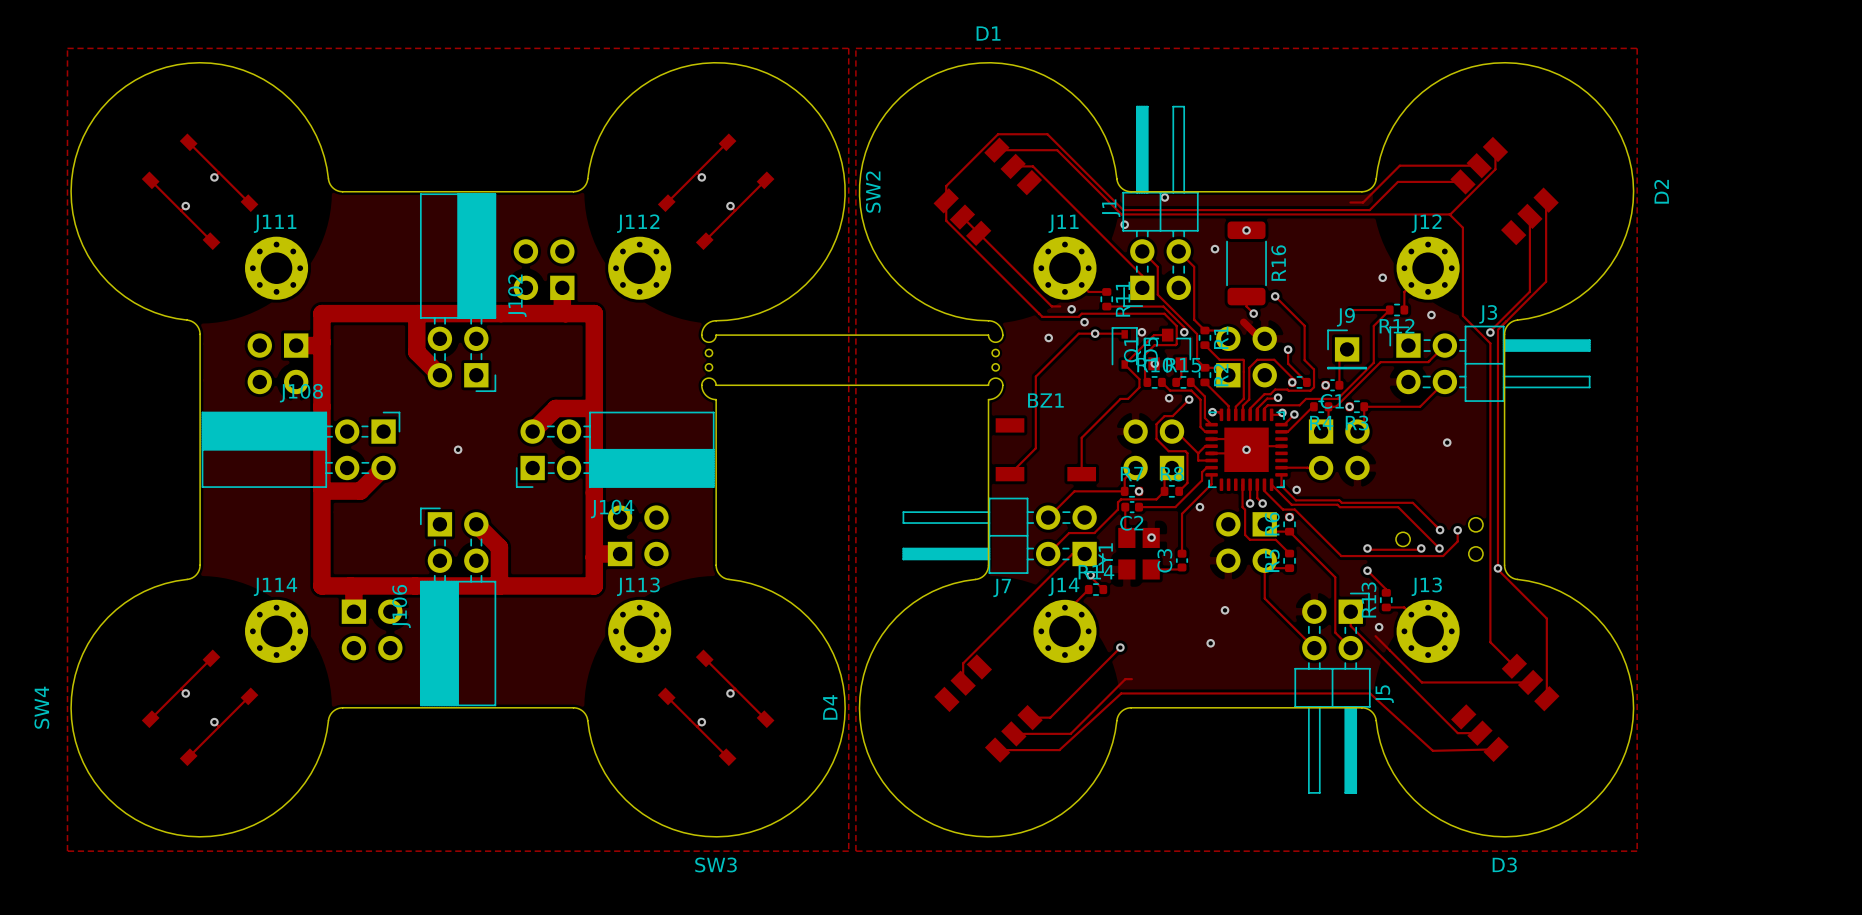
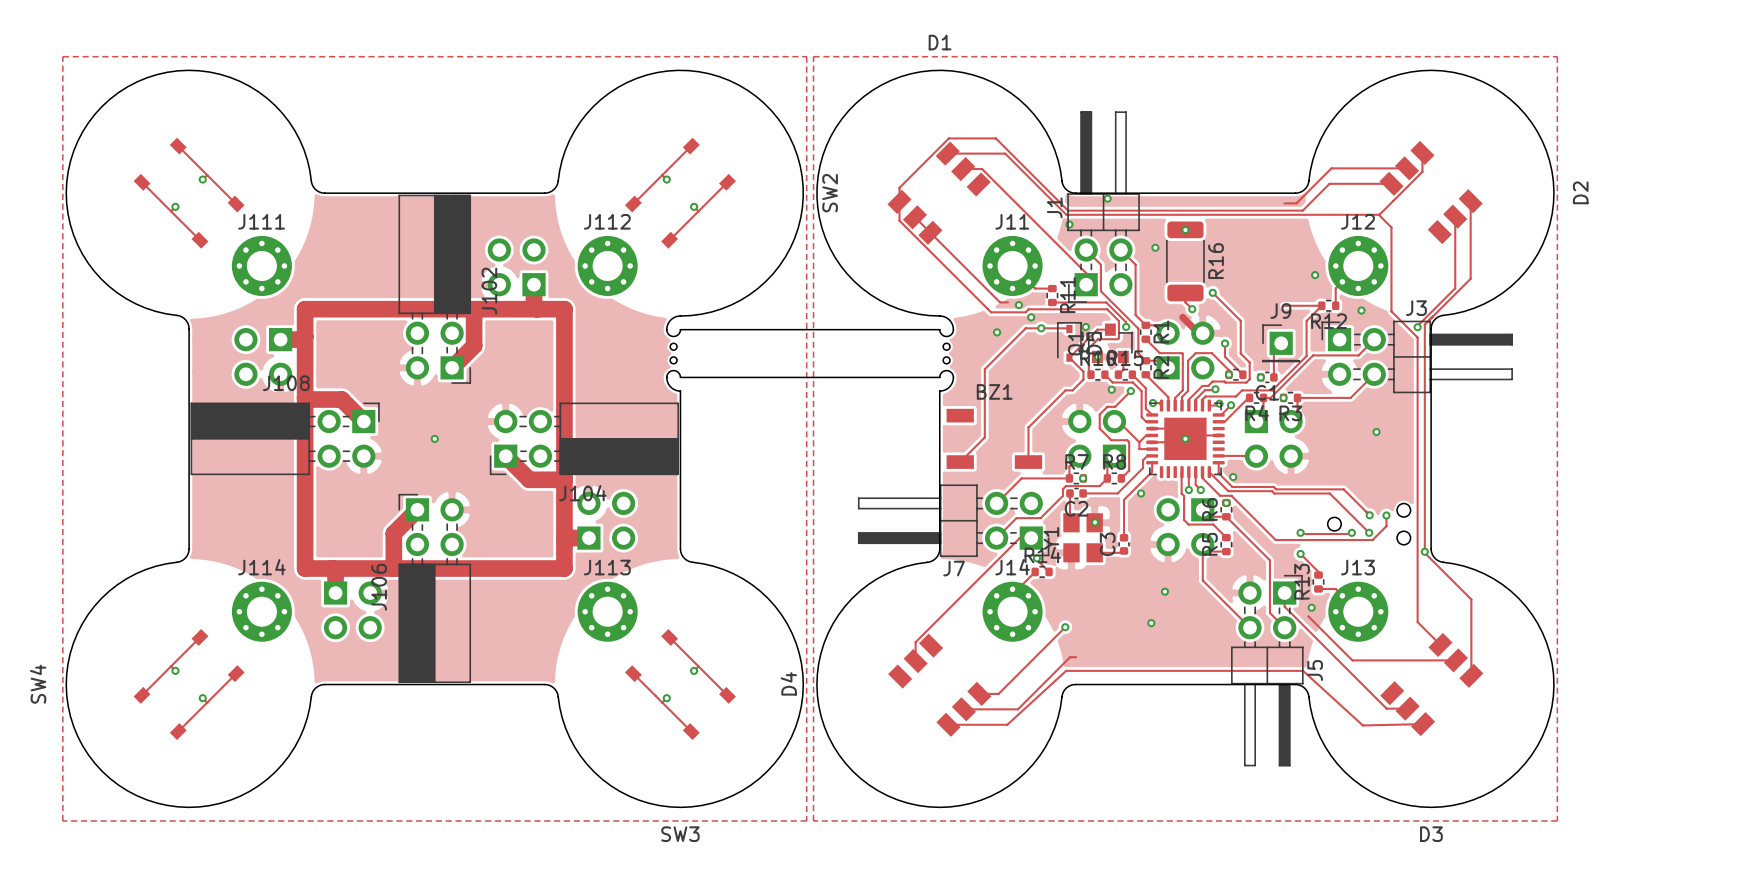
track: (417, 313) (416, 352) (439, 375) -> none
track: none -> (475, 309) (474, 310) (474, 345) (452, 367)
track: none -> (305, 397) (306, 399) (341, 399) (363, 421)
track: (594, 409) (555, 408) (532, 431) -> none
track: (383, 467) (360, 491) (324, 491) (321, 488) -> none
track: none -> (505, 456) (529, 479) (564, 479)
track: none -> (417, 509) (393, 533) (393, 568)
track: (476, 524) (499, 547) (499, 585) -> none

